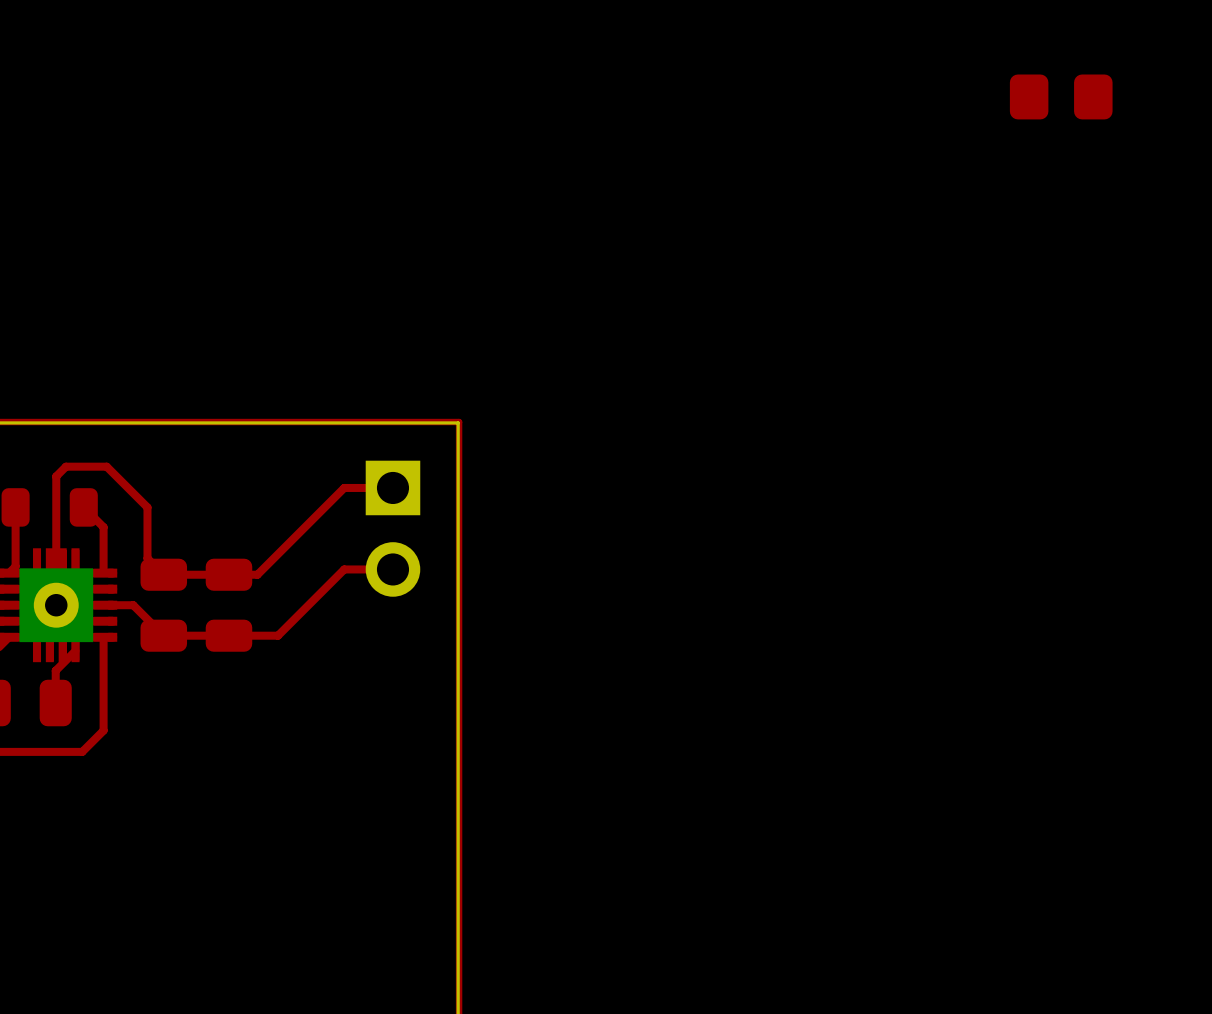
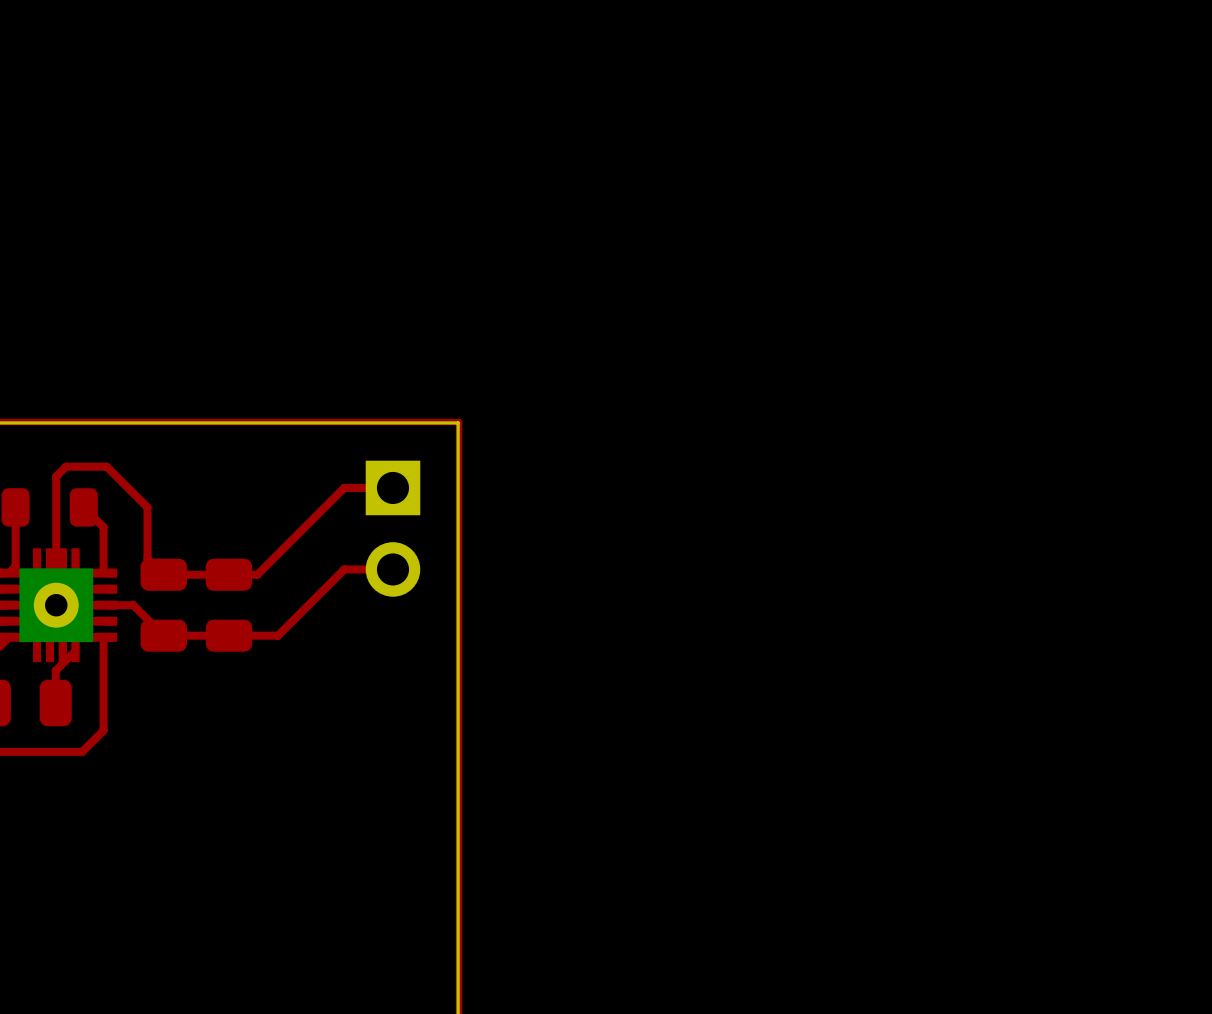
part: (1061, 96) -> none

